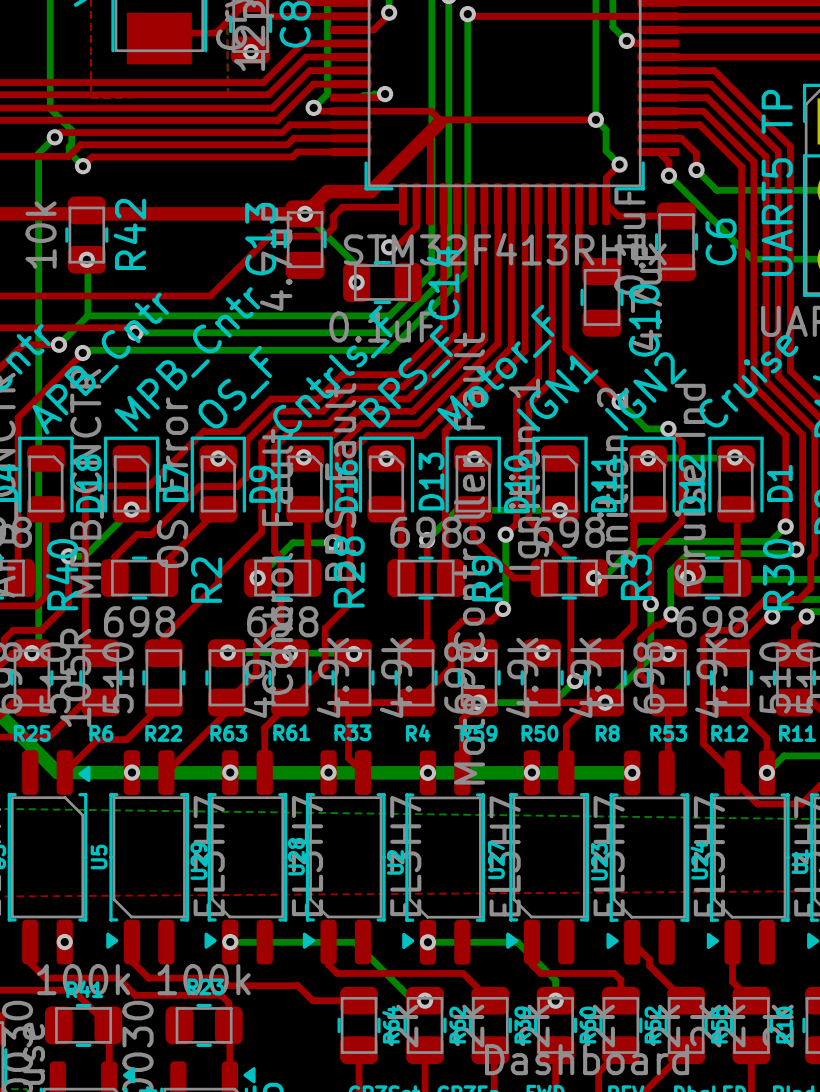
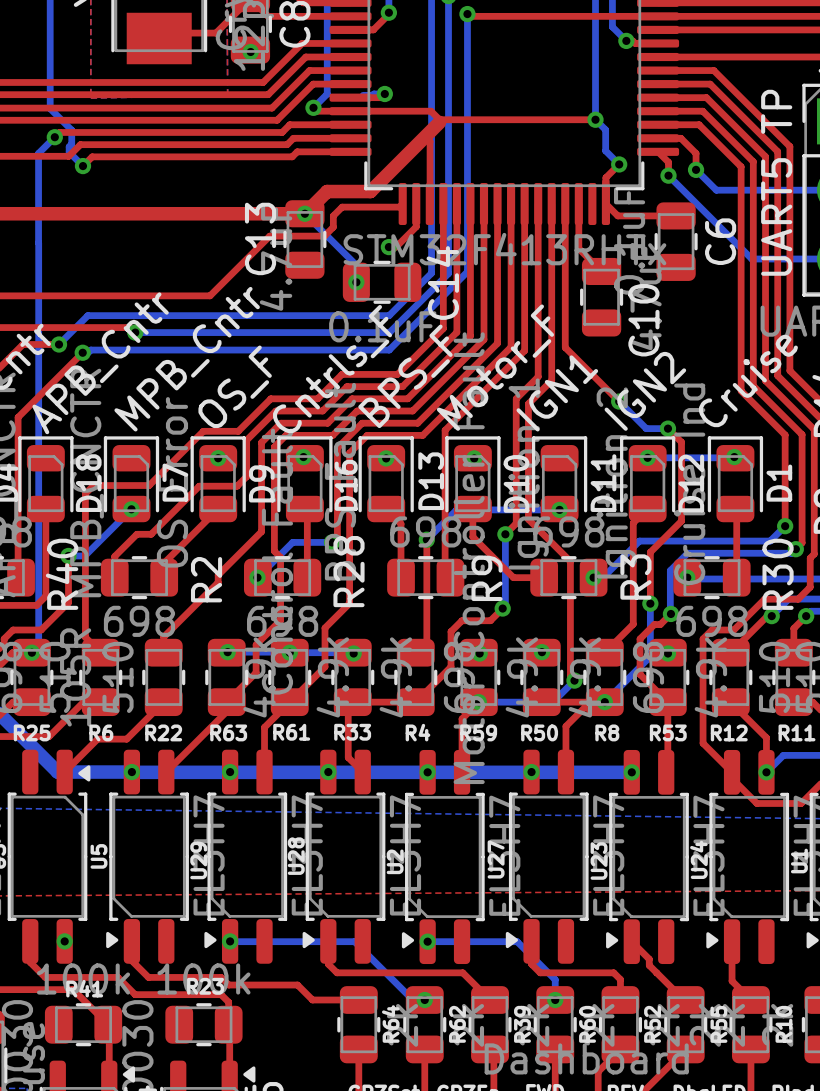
R42: 10k (86, 235) -> none
bottom track: (86, 259) (87, 315) -> none
via: (86, 259) -> none

